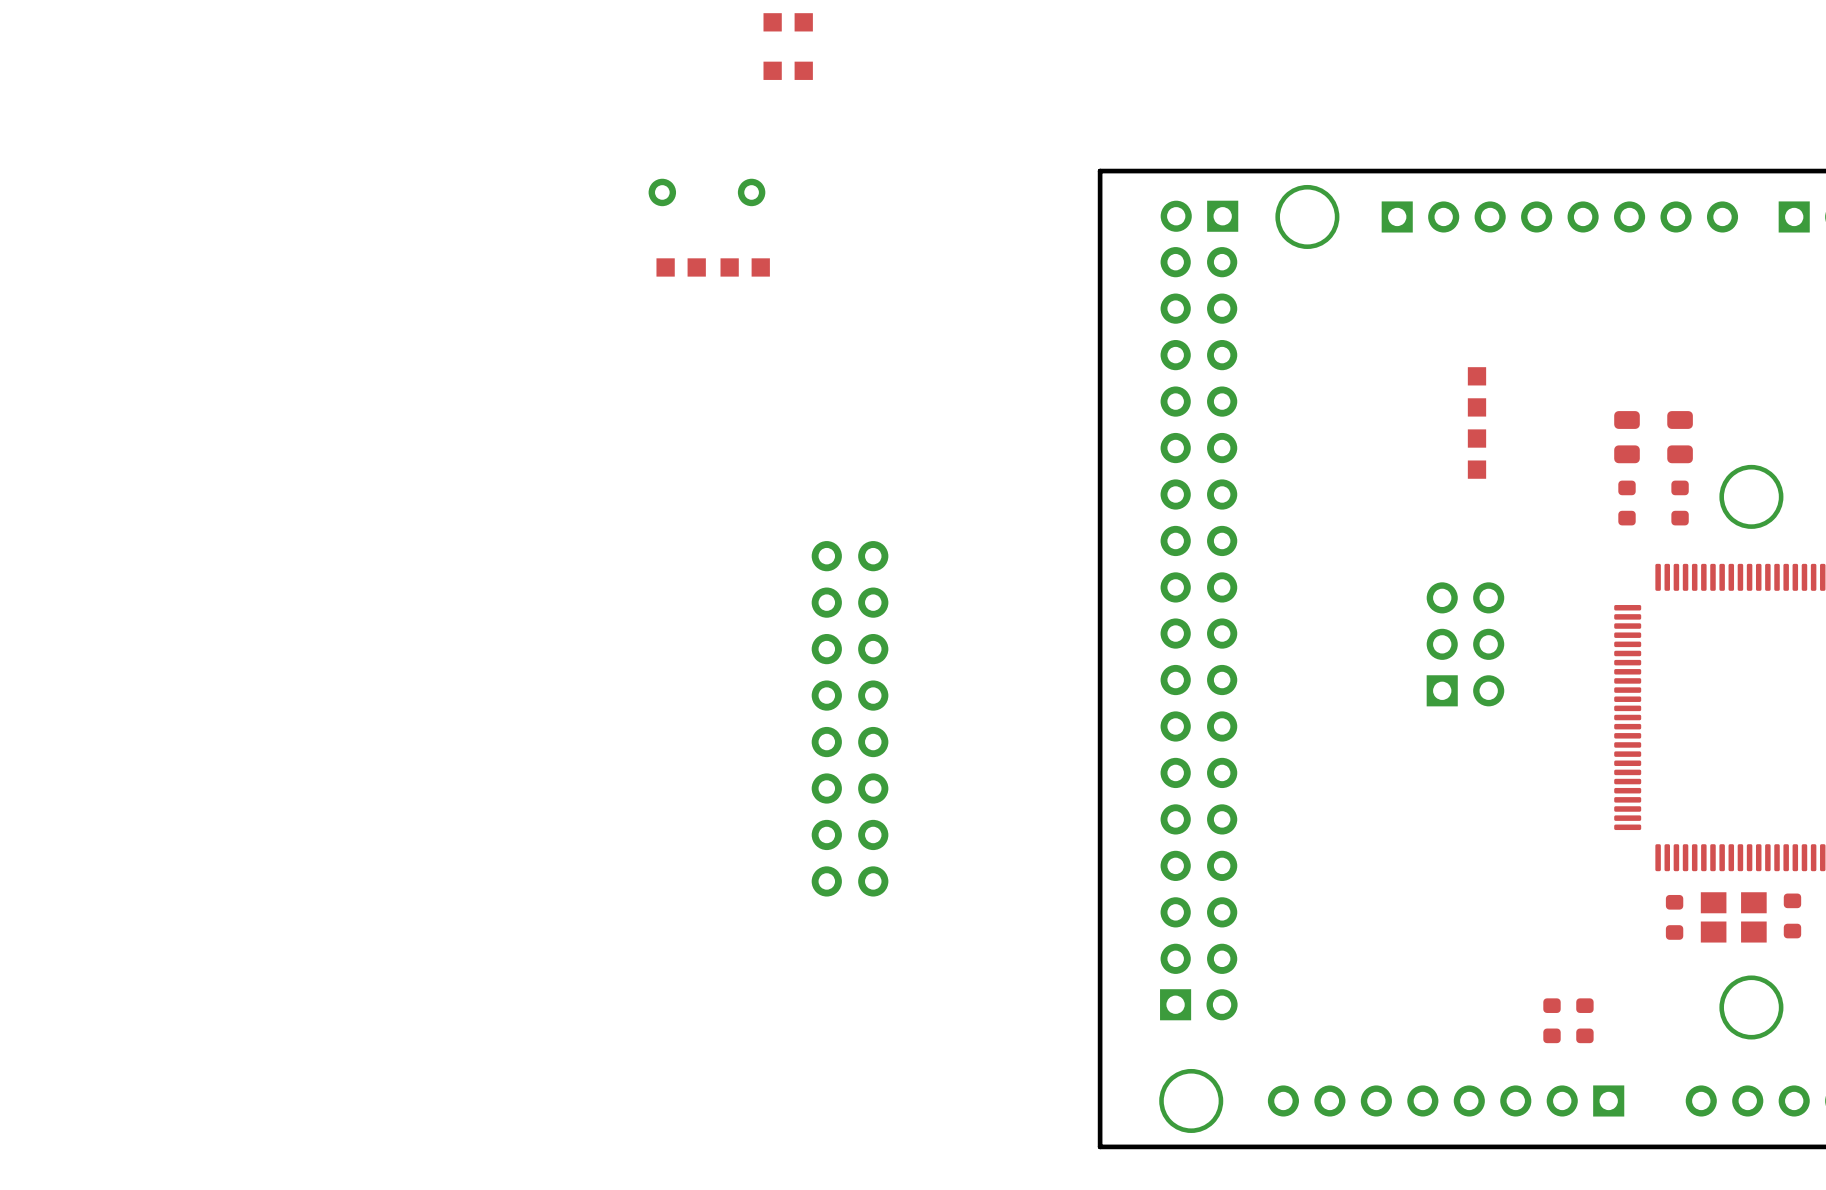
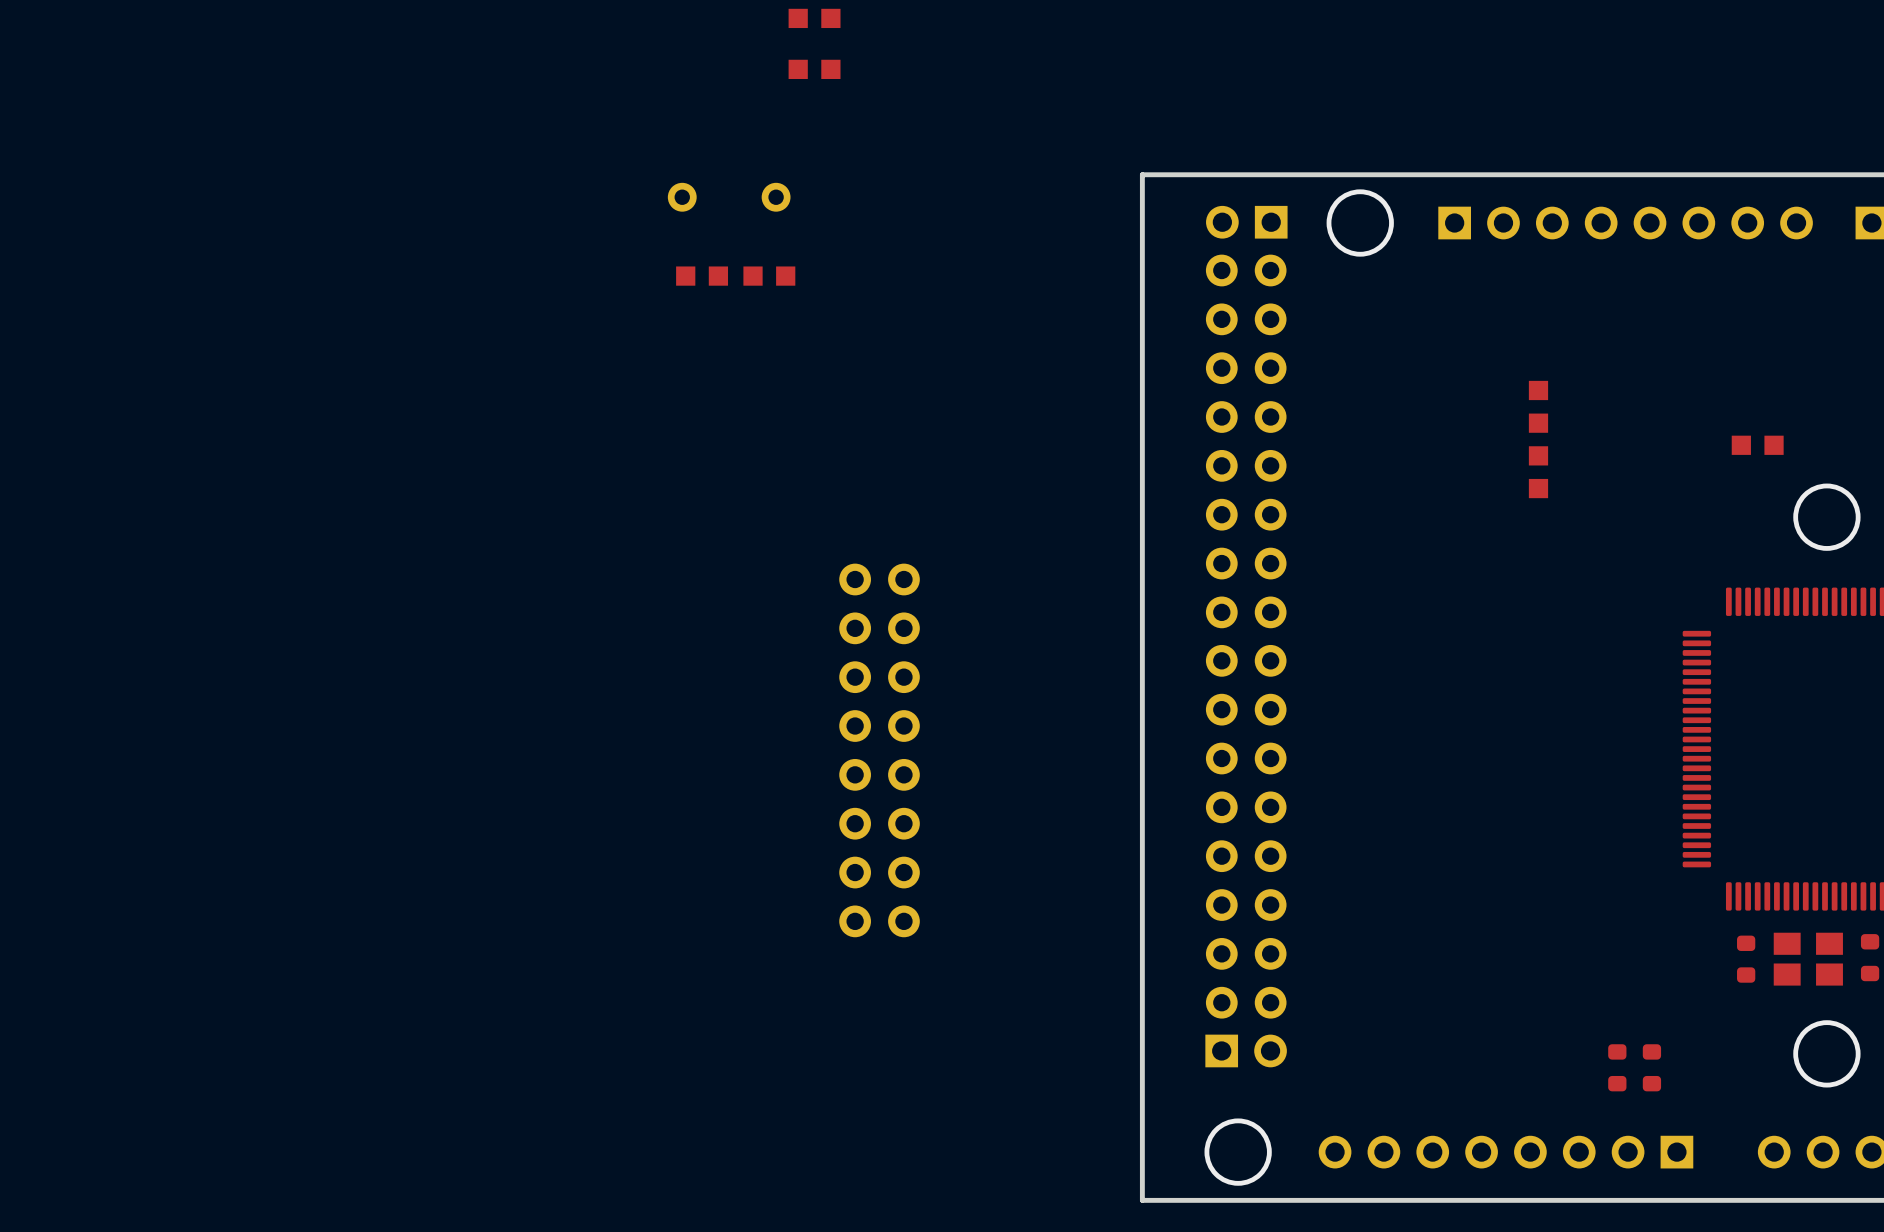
part footprint: [1667, 411, 1693, 464] -> [1731, 435, 1784, 455]
part: (1627, 437) -> none
part: (1627, 503) -> none
part: (1680, 503) -> none
part: (1465, 644) -> none

